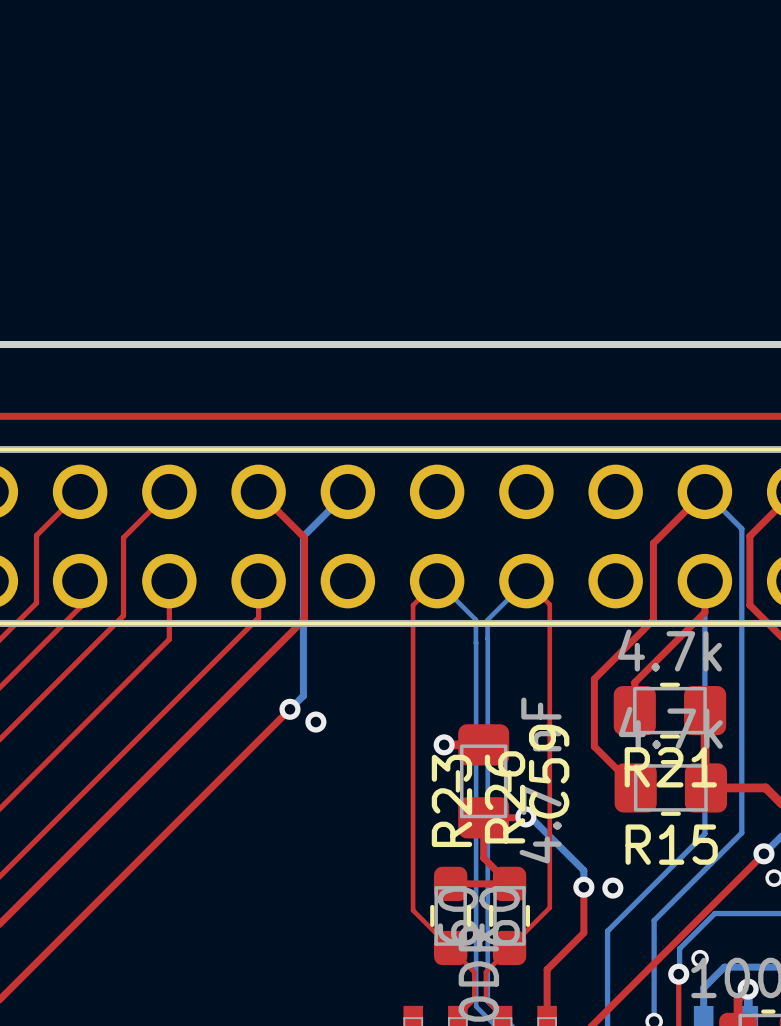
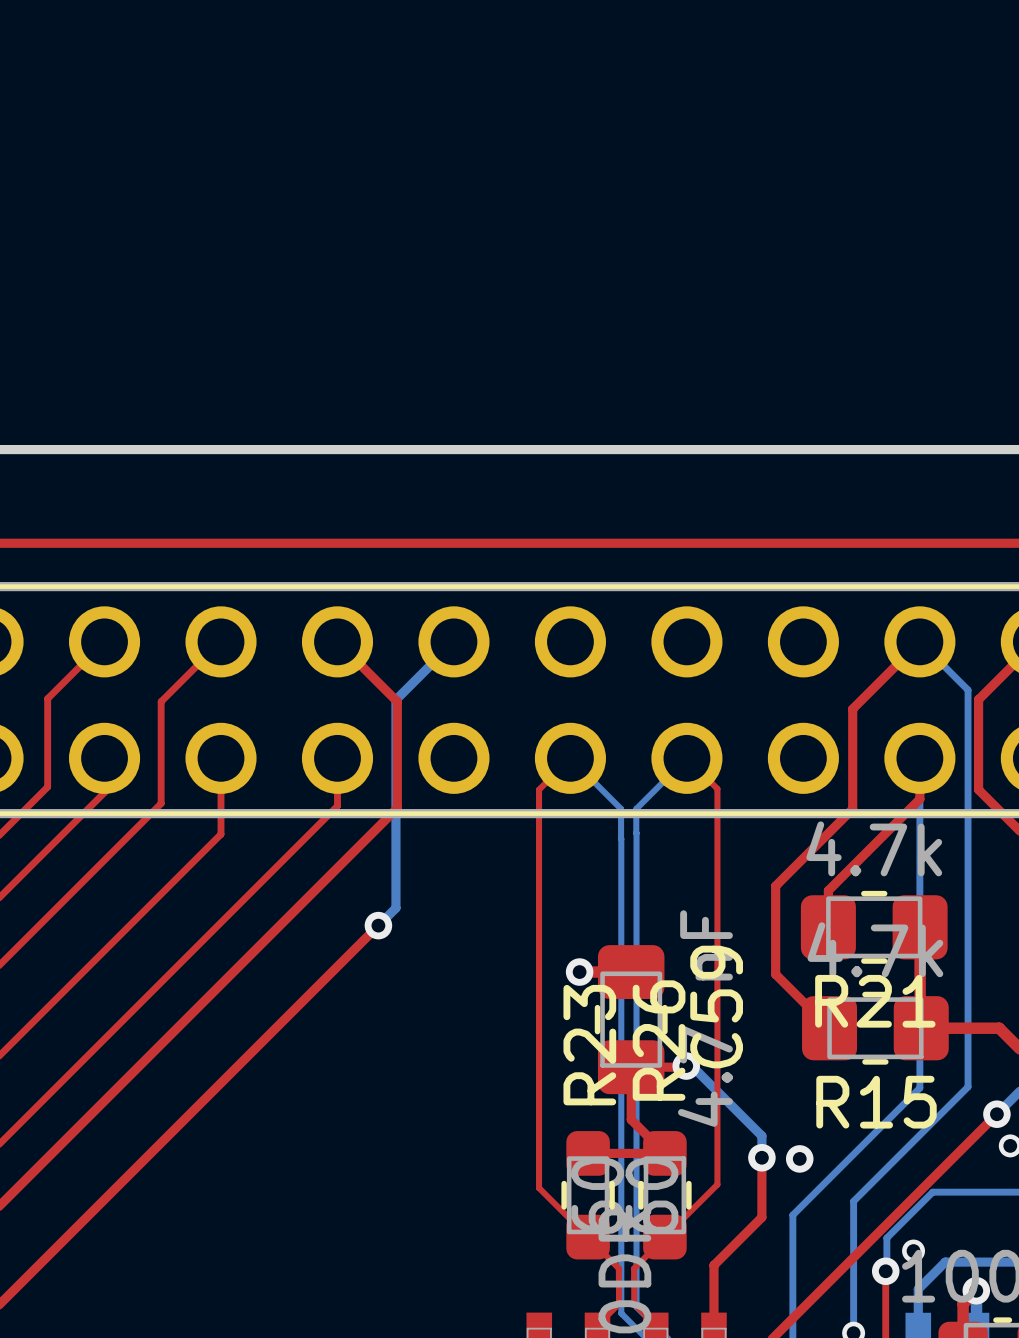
via: (315, 722) -> none

